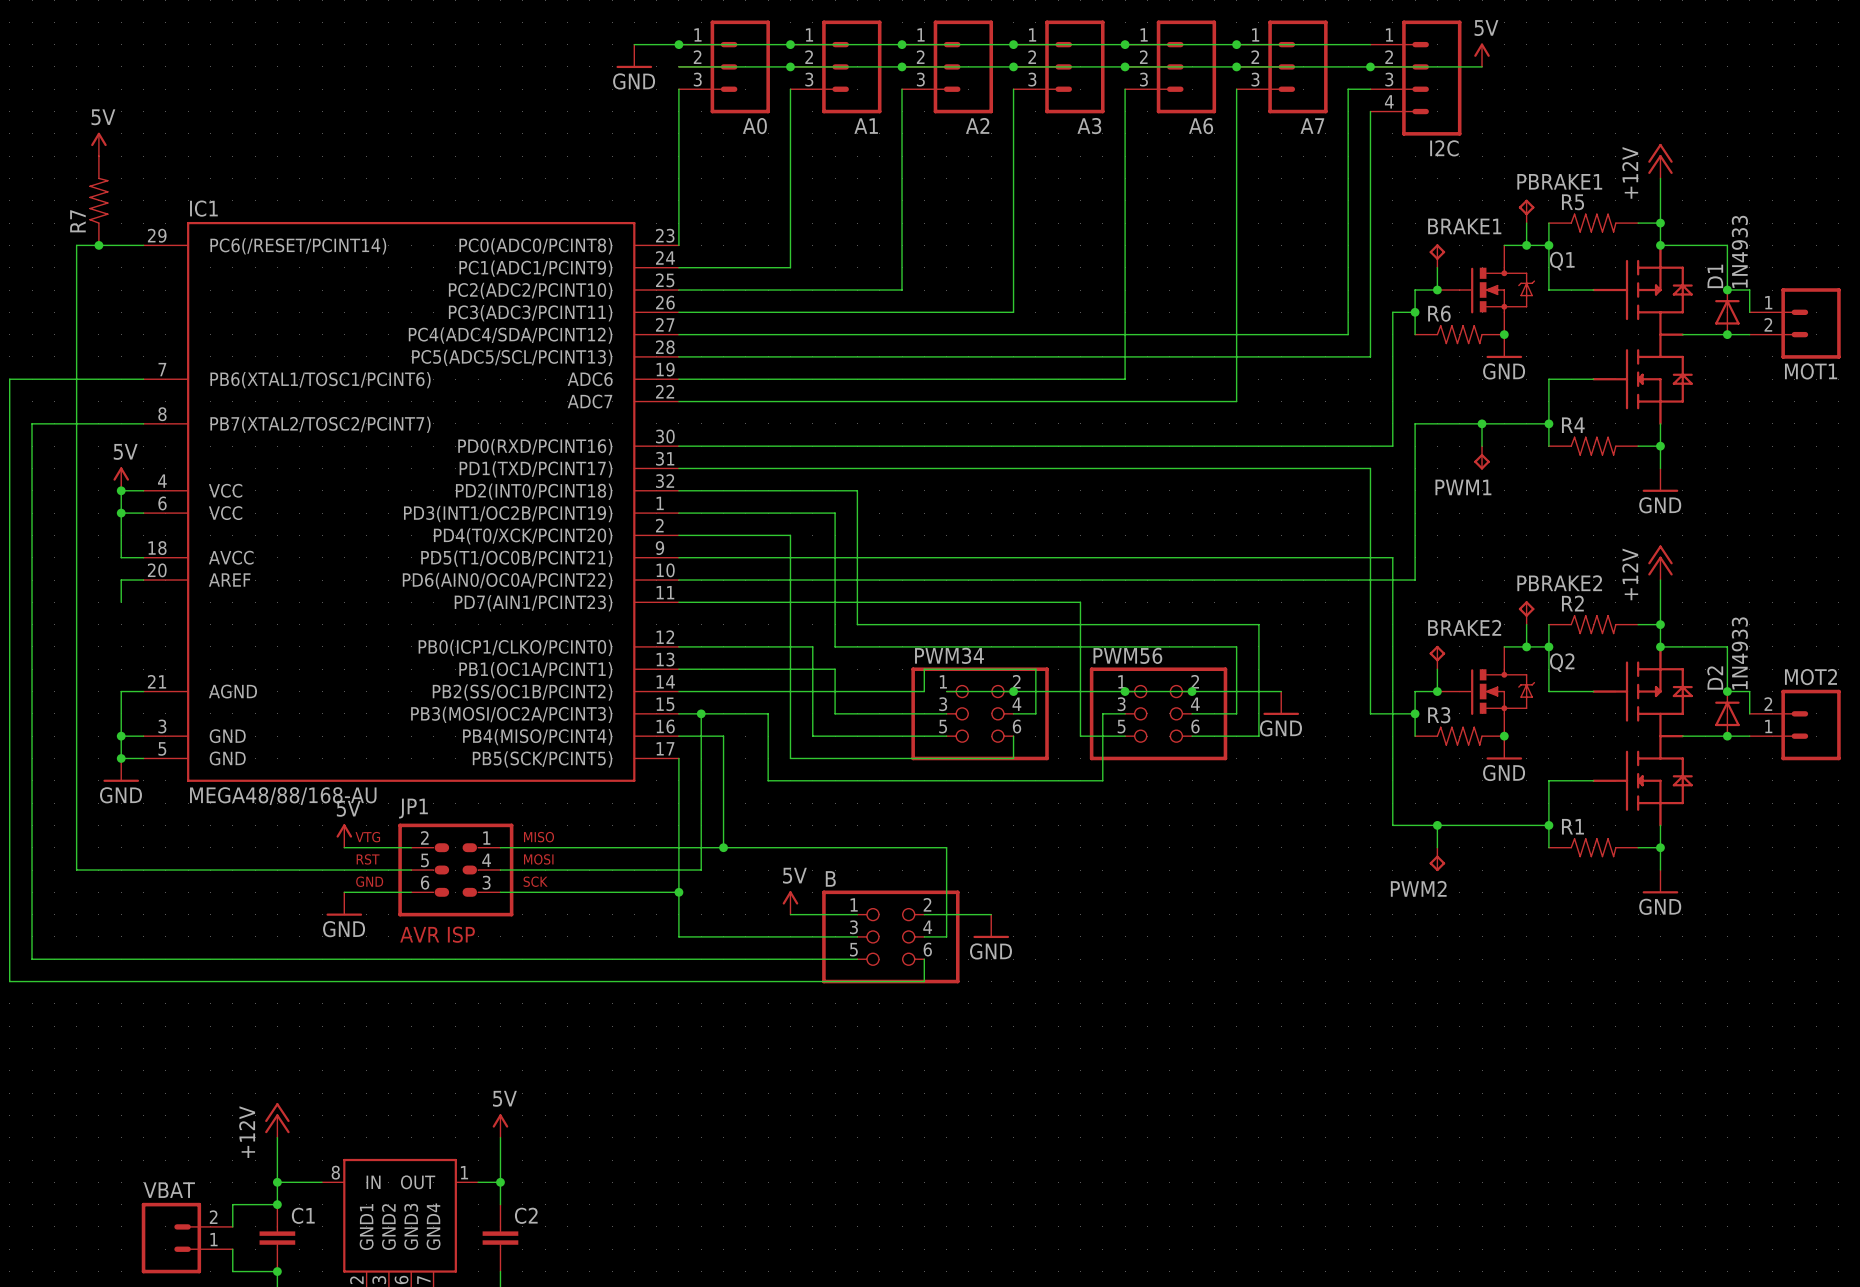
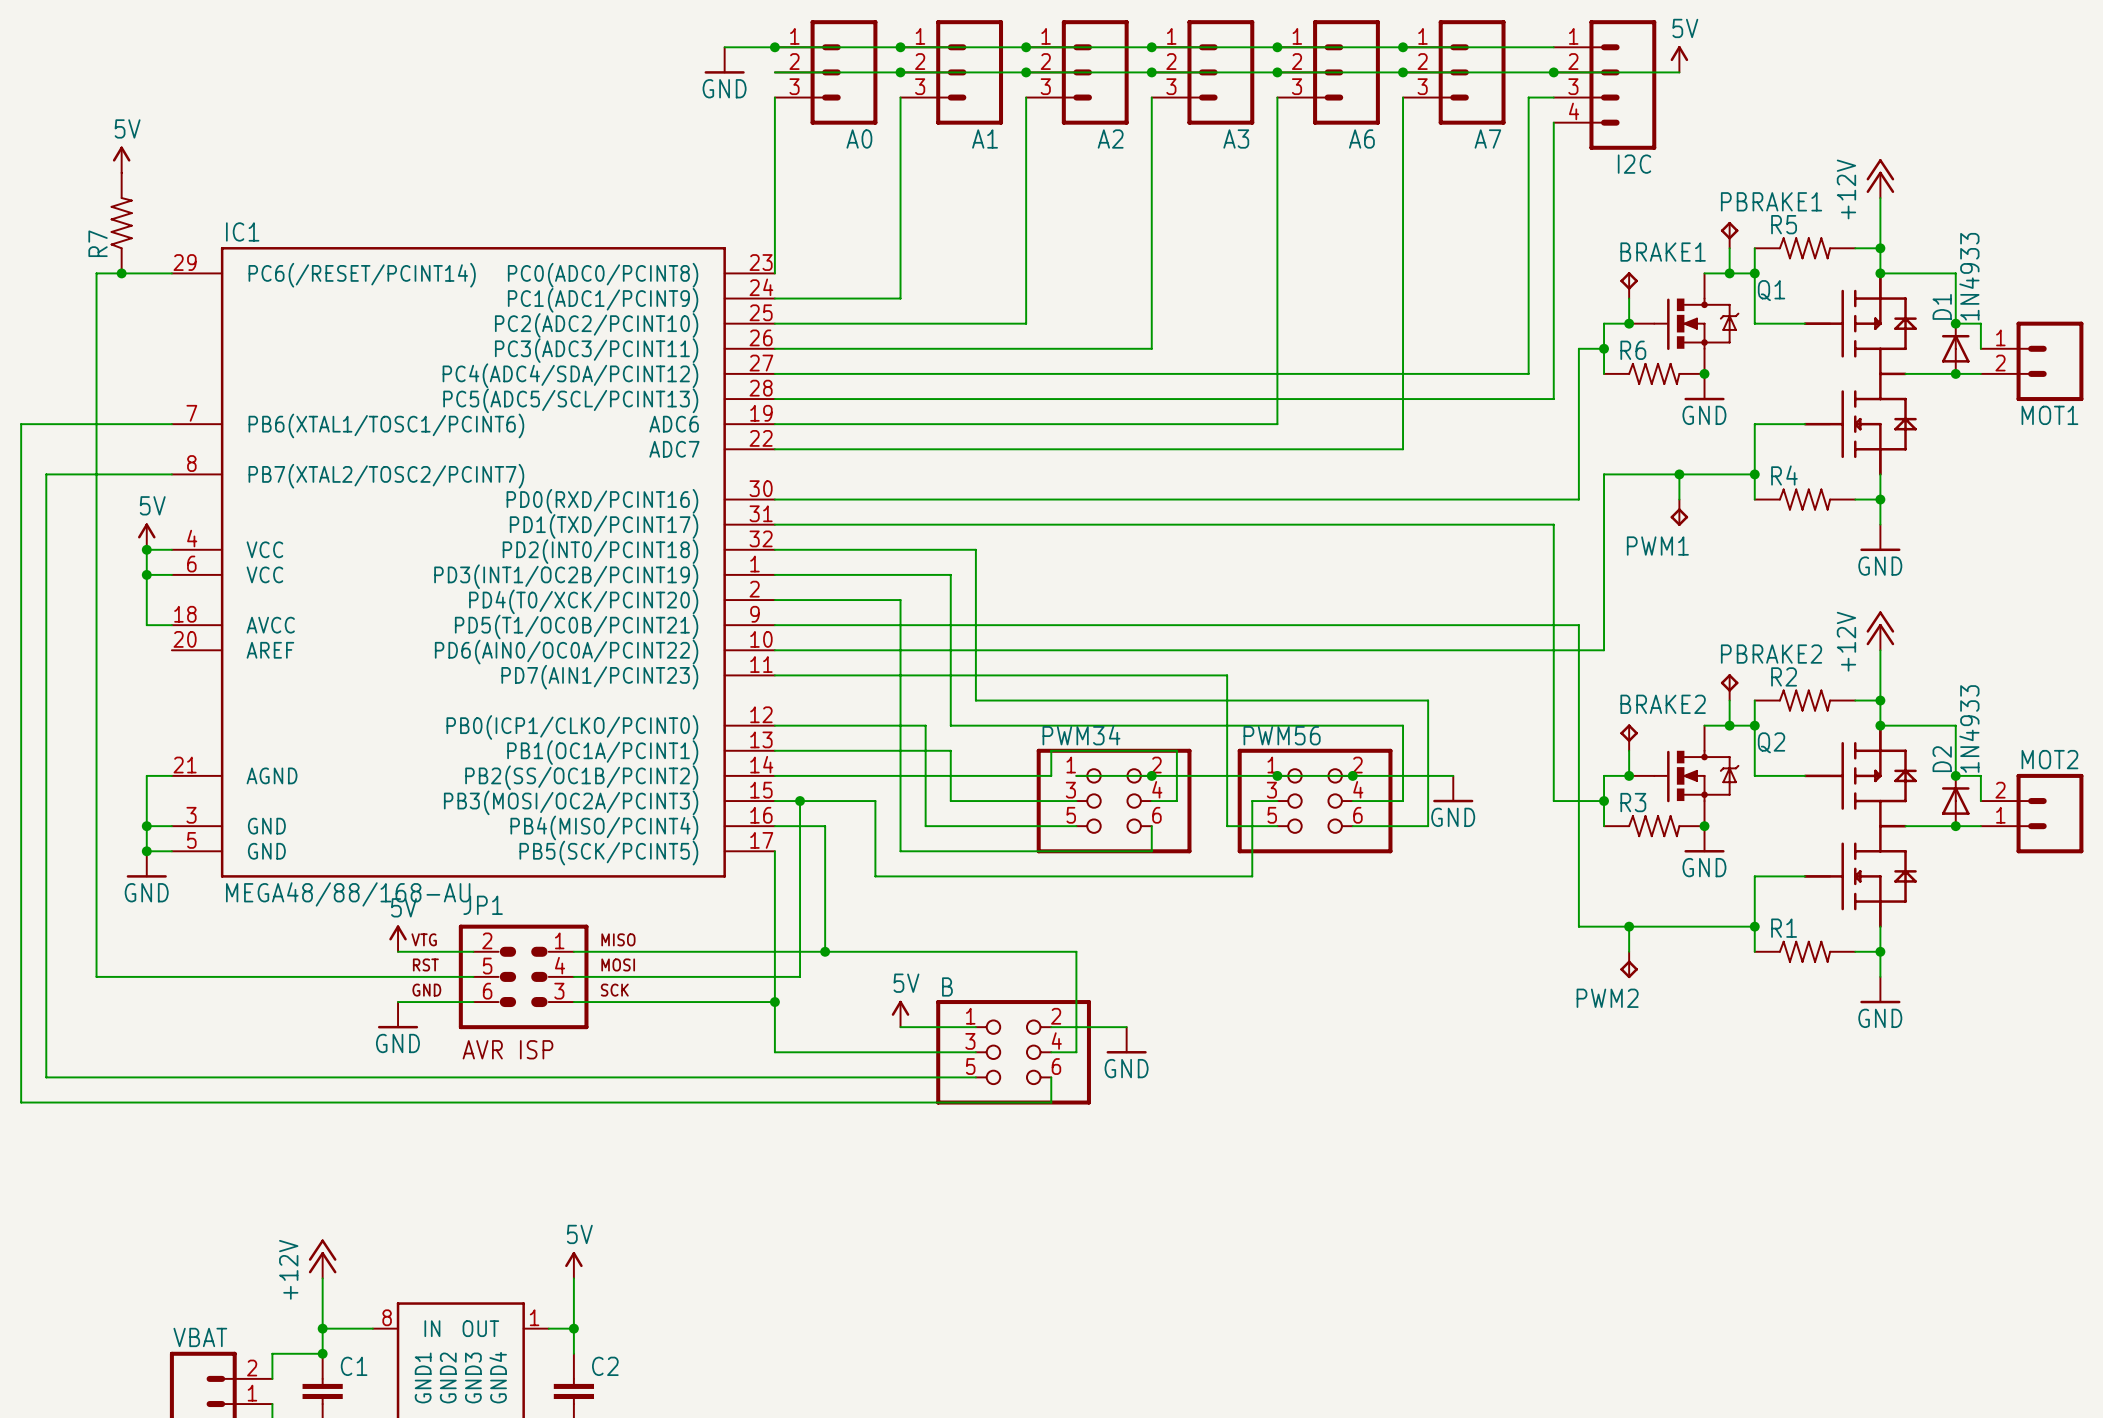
wire: (143, 580) (121, 580) (121, 602) -> none

